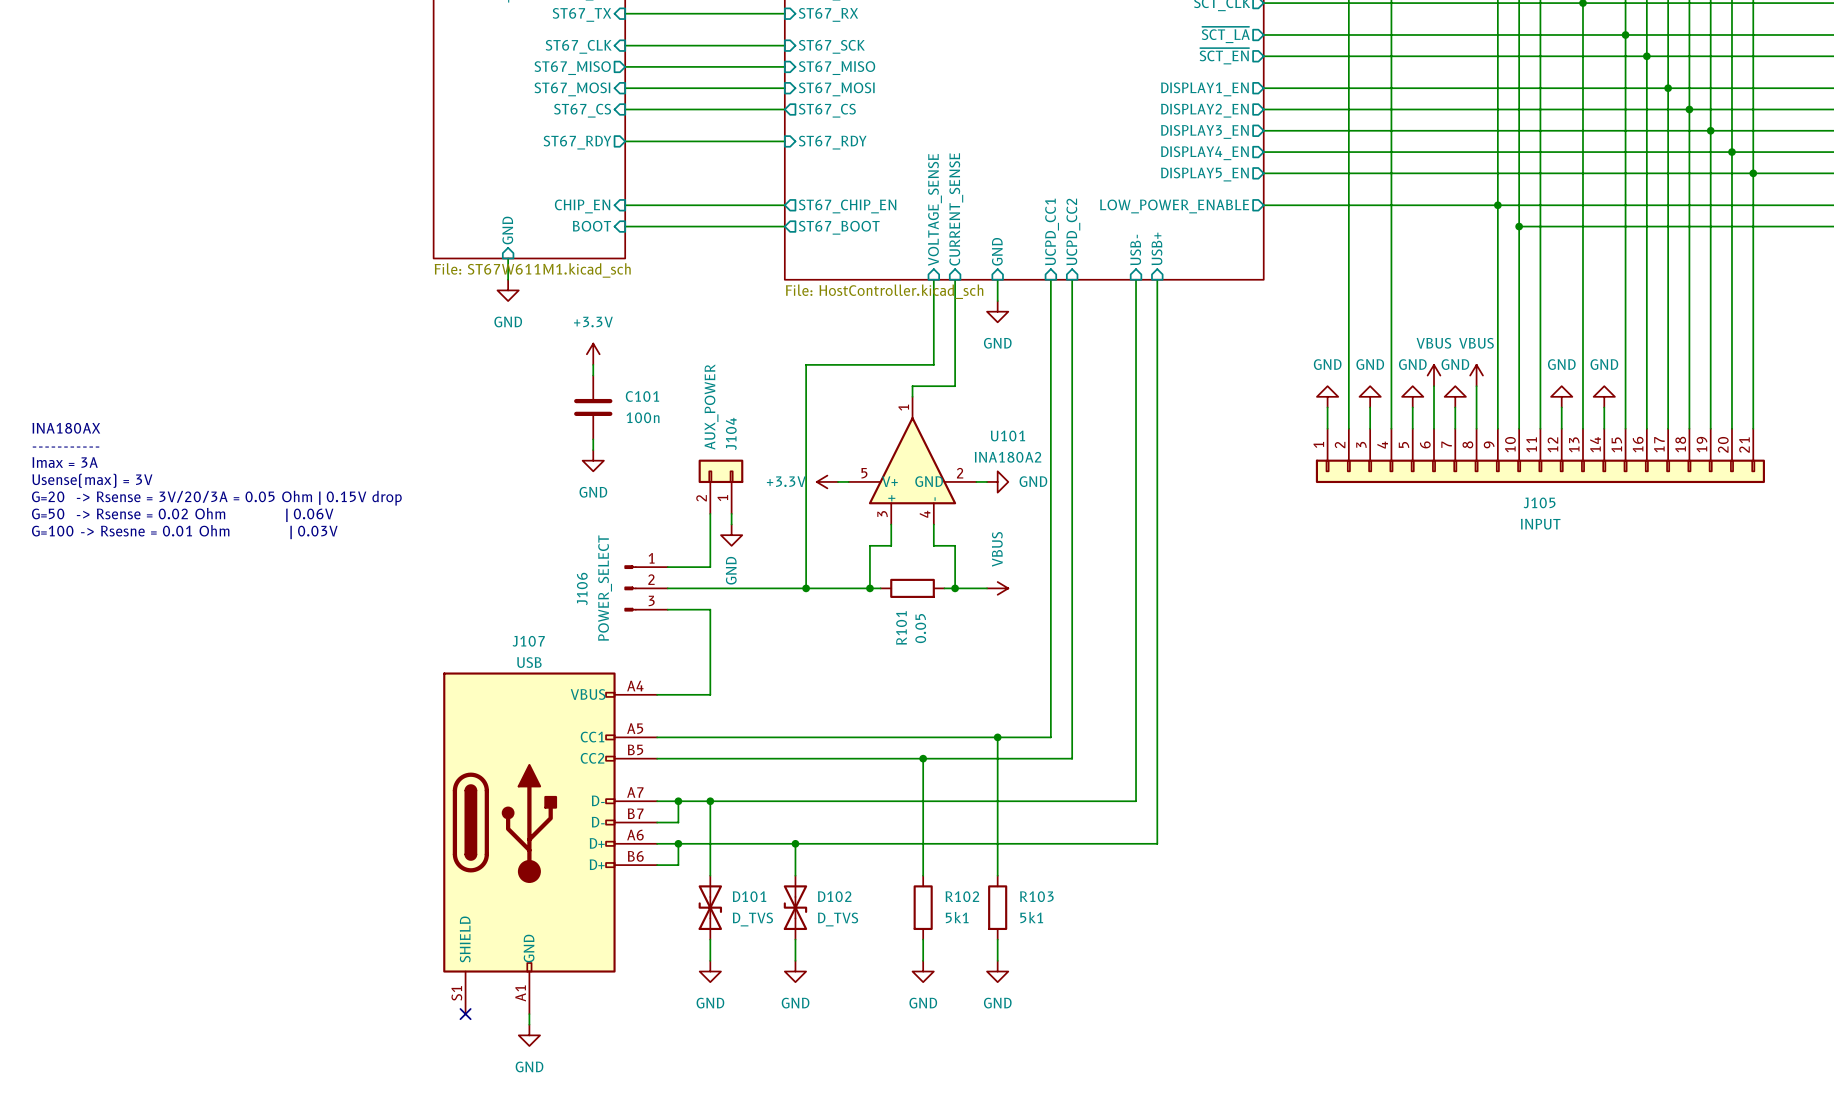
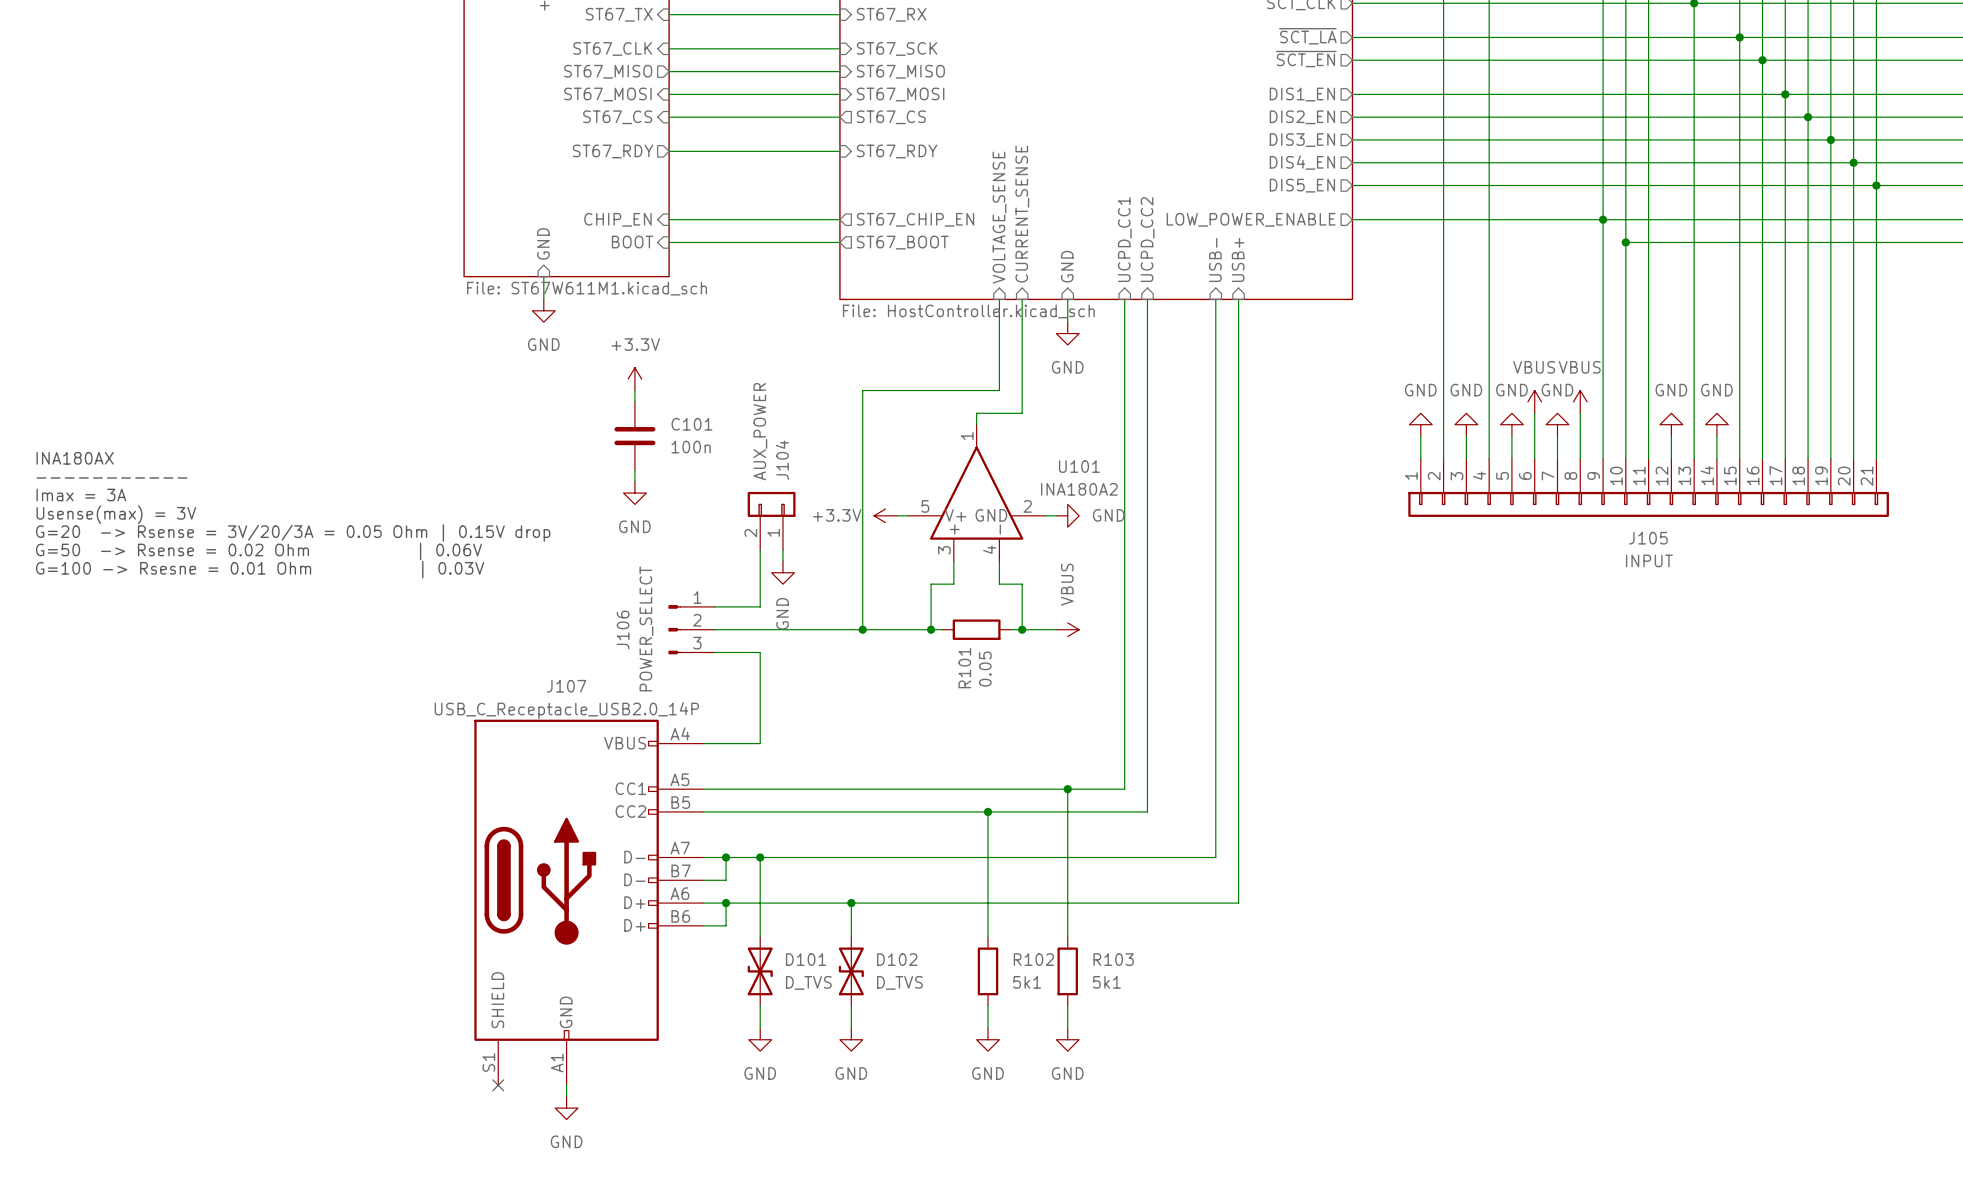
sheet pin: DISPLAY1_EN (1204, 89) -> DIS1_EN (1302, 94)
sheet pin: DISPLAY2_EN (1204, 110) -> DIS2_EN (1302, 117)
sheet pin: DISPLAY3_EN (1204, 131) -> DIS3_EN (1302, 140)
sheet pin: DISPLAY4_EN (1204, 153) -> DIS4_EN (1302, 162)
sheet pin: DISPLAY5_EN (1204, 174) -> DIS5_EN (1302, 185)
J107 value: USB (529, 662) -> USB_C_Receptacle_USB2.0_14P (566, 710)

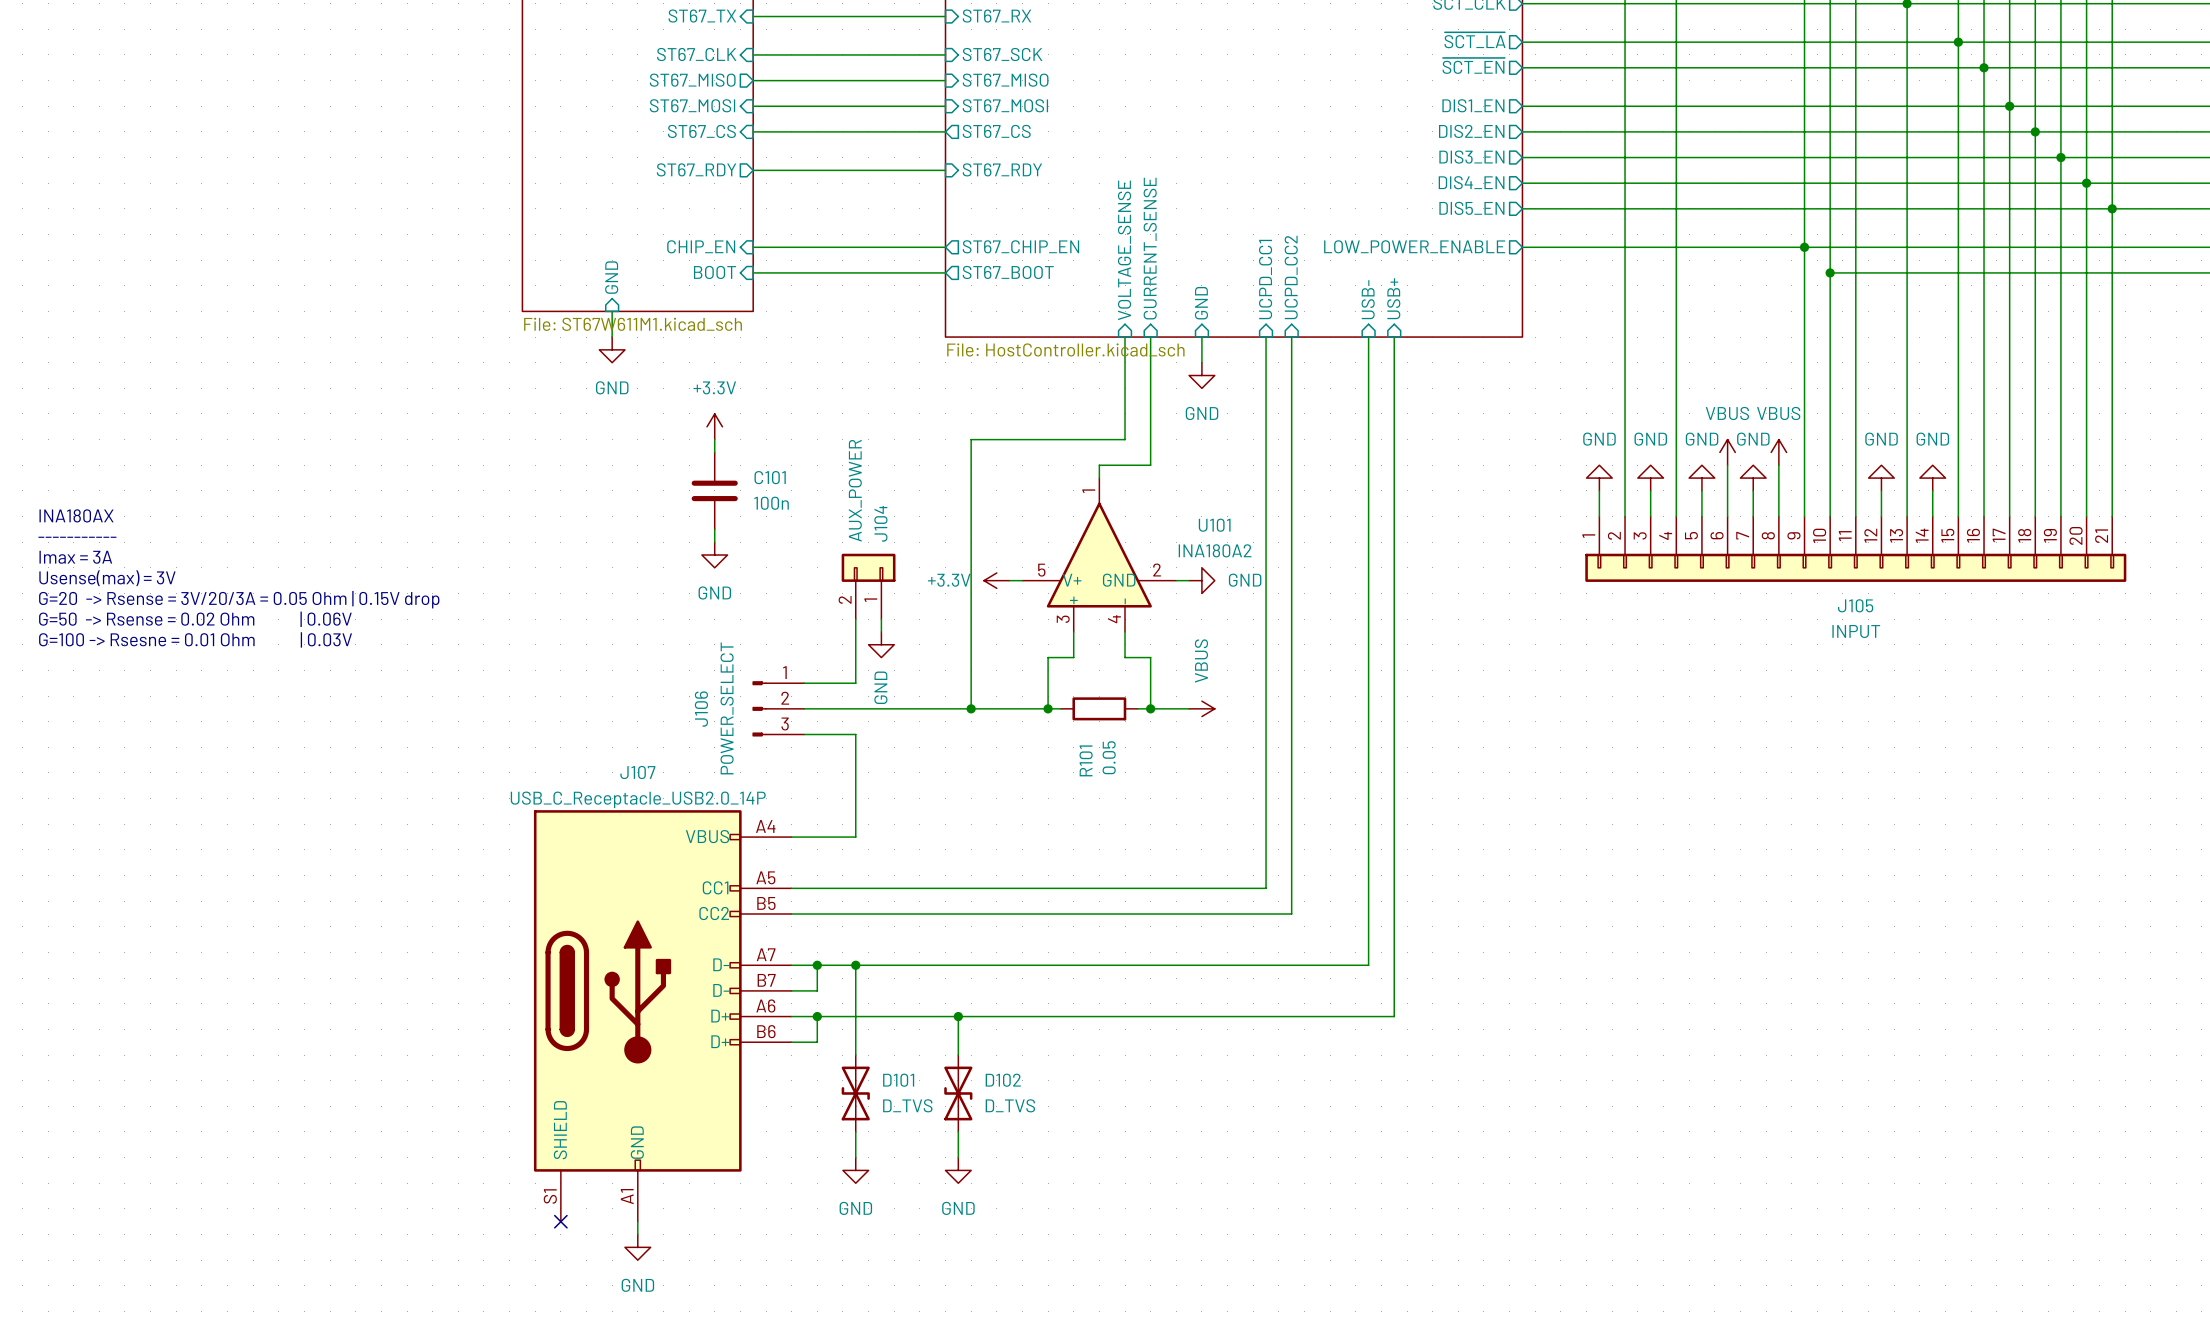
wire: (1067, 789) (1067, 937) -> none
junction: (1067, 789) -> none
wire: (988, 811) (988, 937) -> none
junction: (988, 811) -> none
R102: 5k1 (988, 971) -> none
R103: 5k1 (1067, 971) -> none
wire: (988, 1005) (988, 1028) -> none
wire: (1067, 1005) (1067, 1028) -> none
power symbol: GND (988, 1039) -> none
power symbol: GND (1067, 1039) -> none

